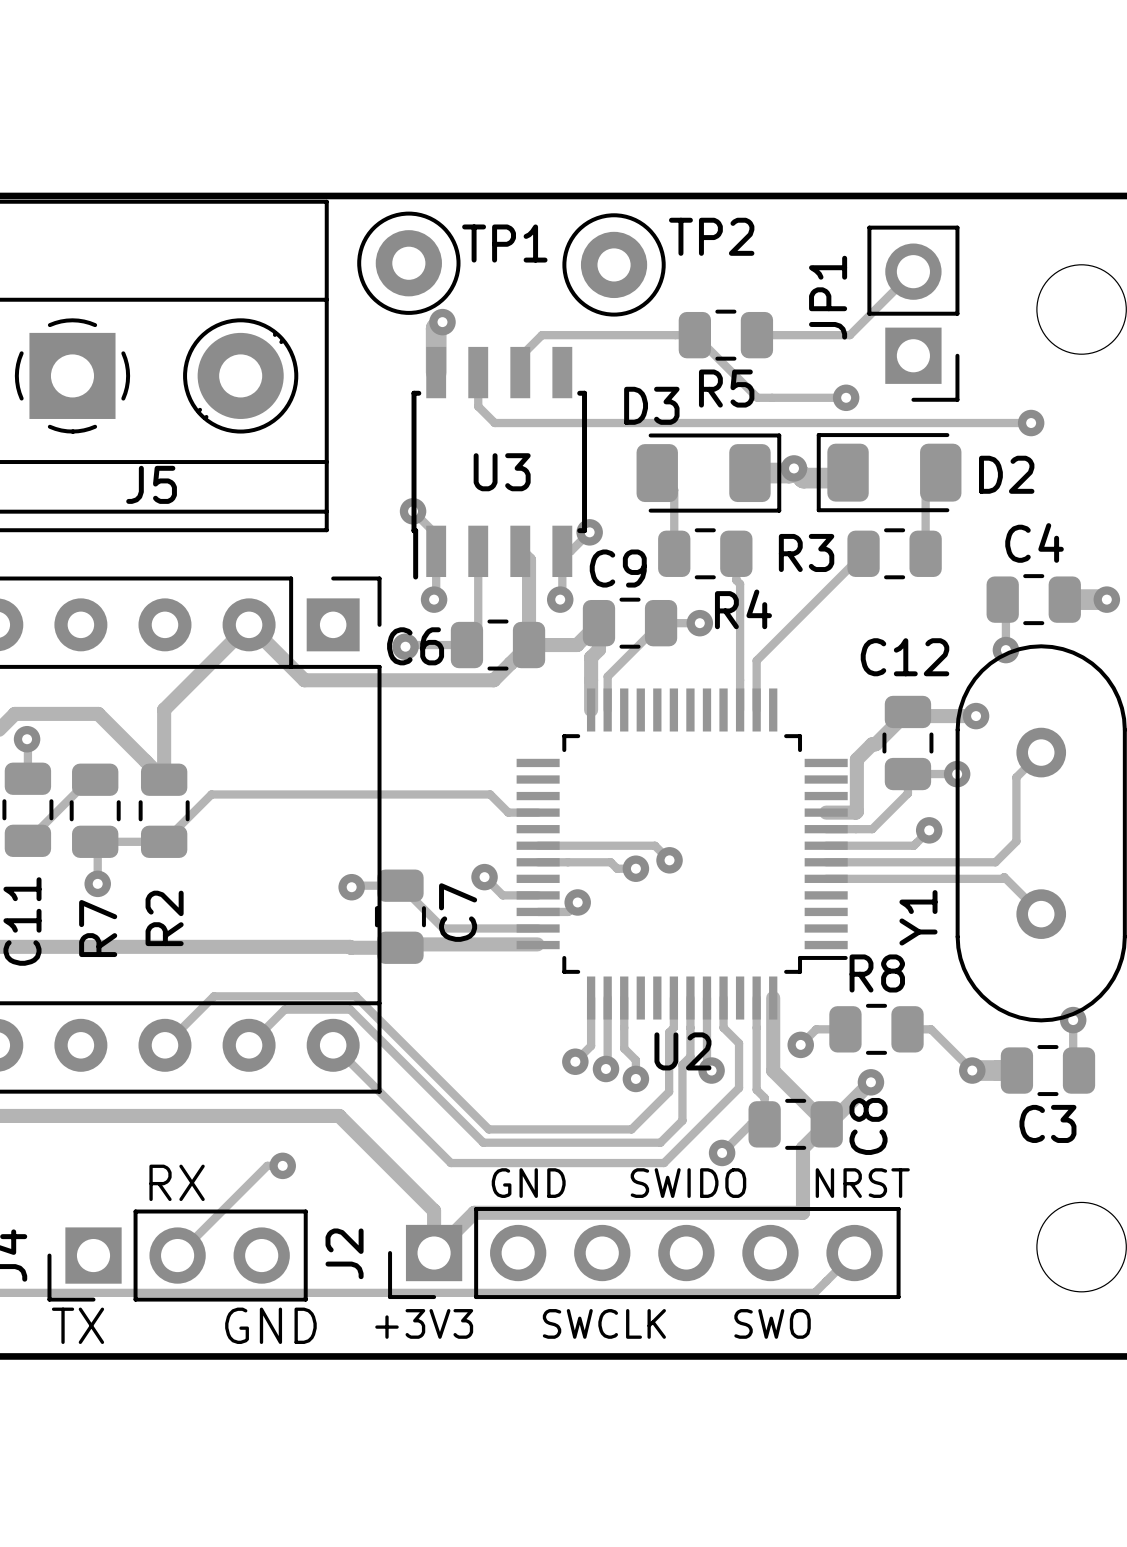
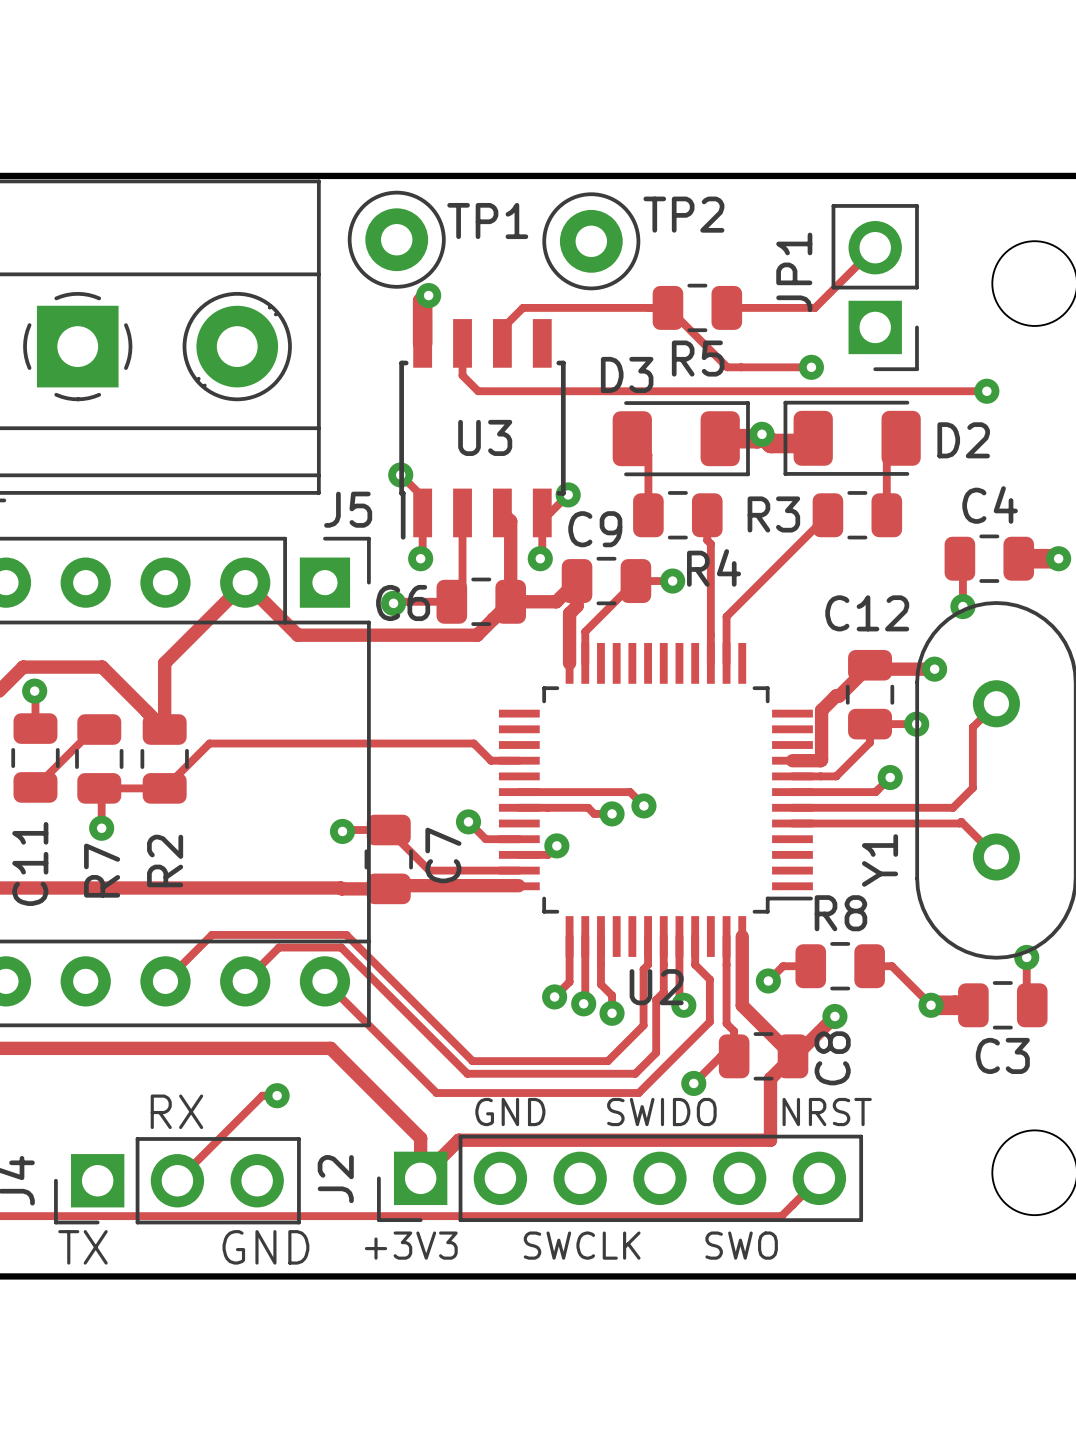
J5 name position: J5 (151, 484) -> J5 (348, 509)

